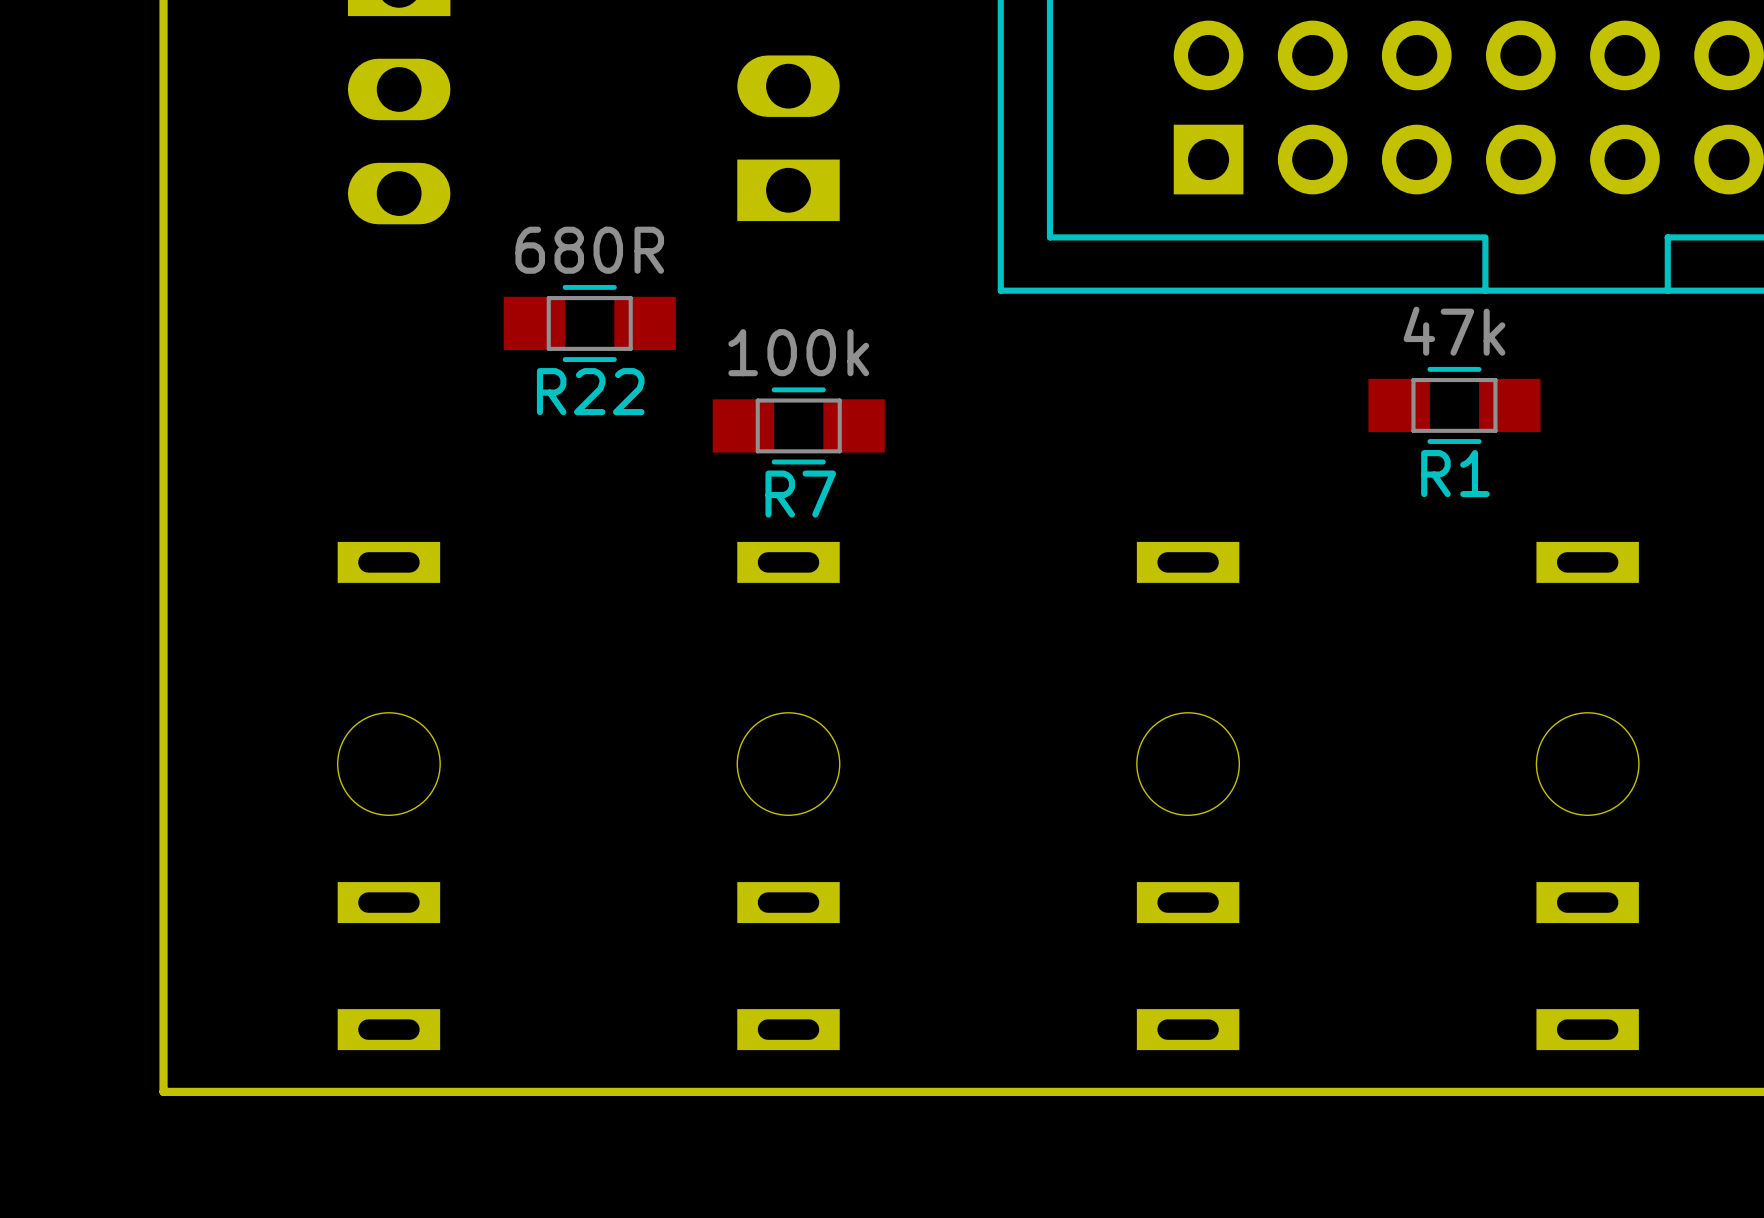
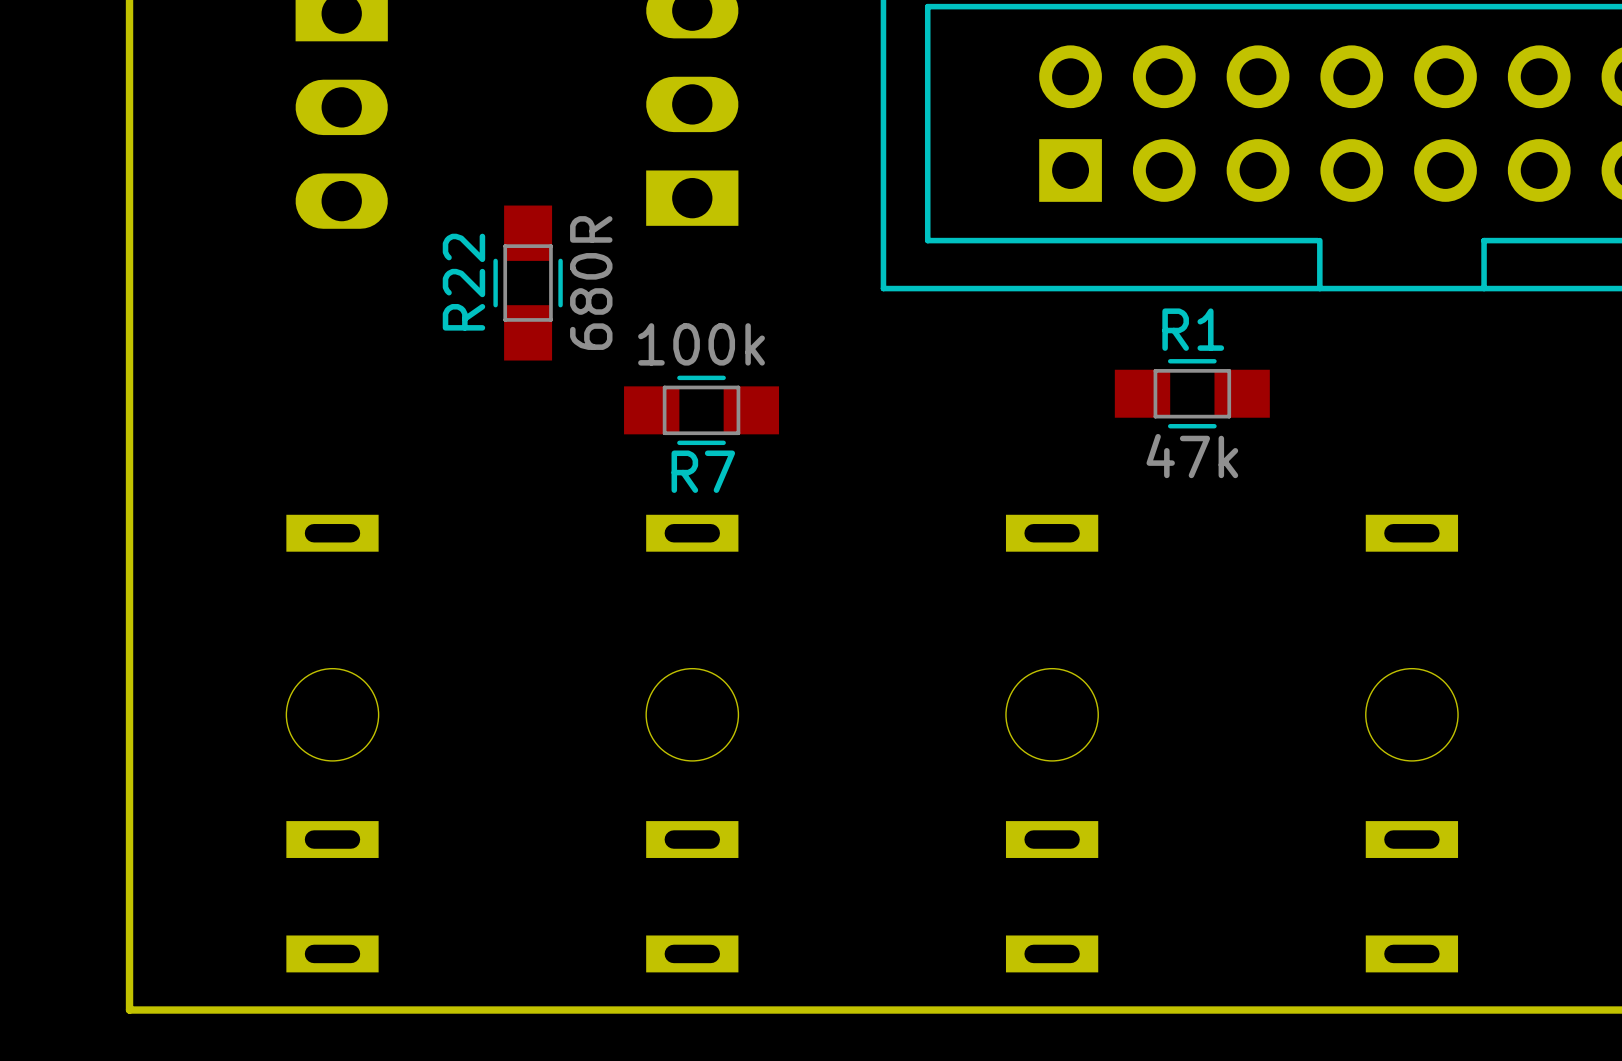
R22 rotation: 0° (589, 323) -> 90° clockwise (528, 283)
R1 value position: 47k (1454, 331) -> 47k (1192, 456)
R1 position: (1454, 405) -> (1192, 393)
R1 name position: R1 (1455, 473) -> R1 (1193, 329)

